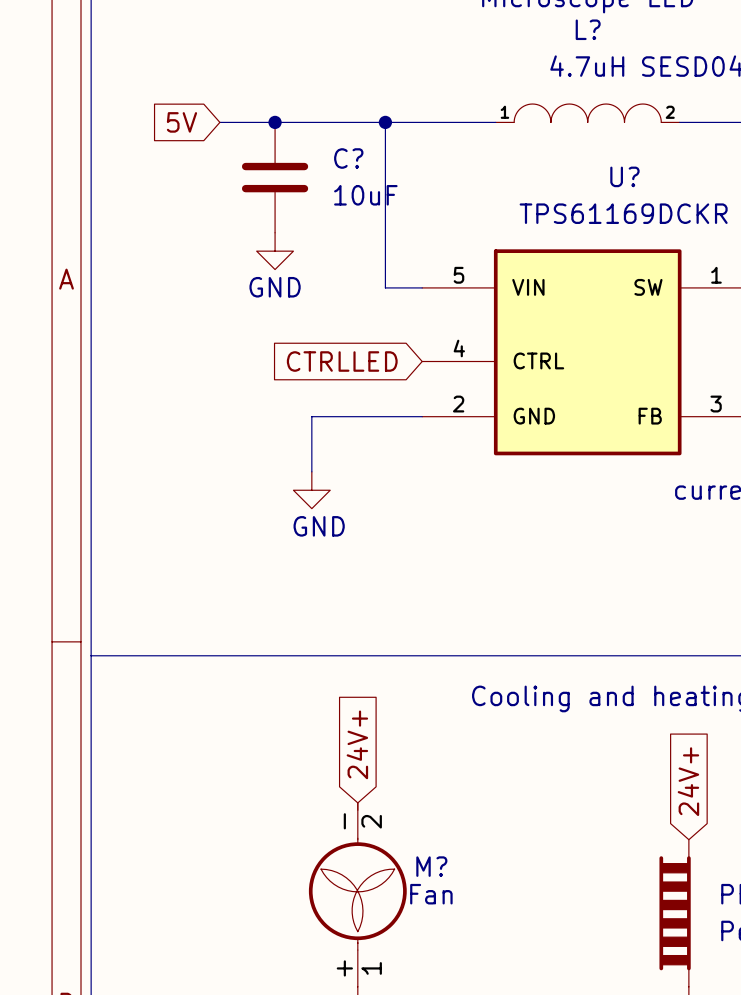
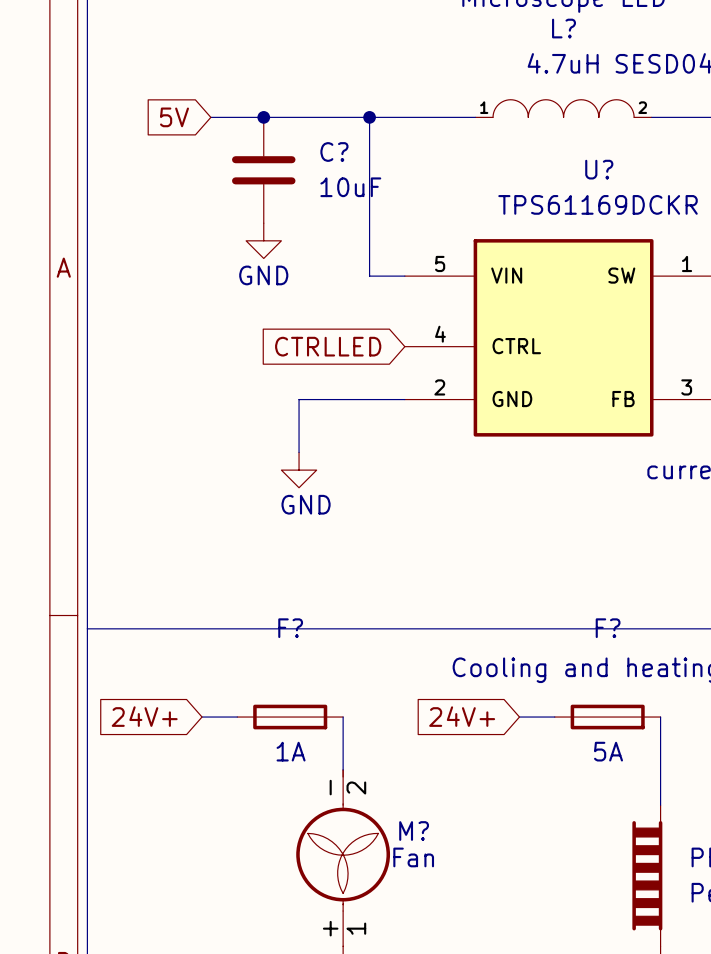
global label: 24V+ (357, 744) -> none
global label: none -> 24V+ (144, 716)
wire: none -> (202, 717) (237, 717)
F?: none -> 1A (290, 717)
wire: none -> (343, 717) (343, 769)
global label: none -> 24V+ (462, 716)
wire: none -> (519, 717) (554, 717)
F?: none -> 5A (607, 717)
wire: none -> (660, 717) (660, 805)
global label: 24V+ (688, 781) -> none

